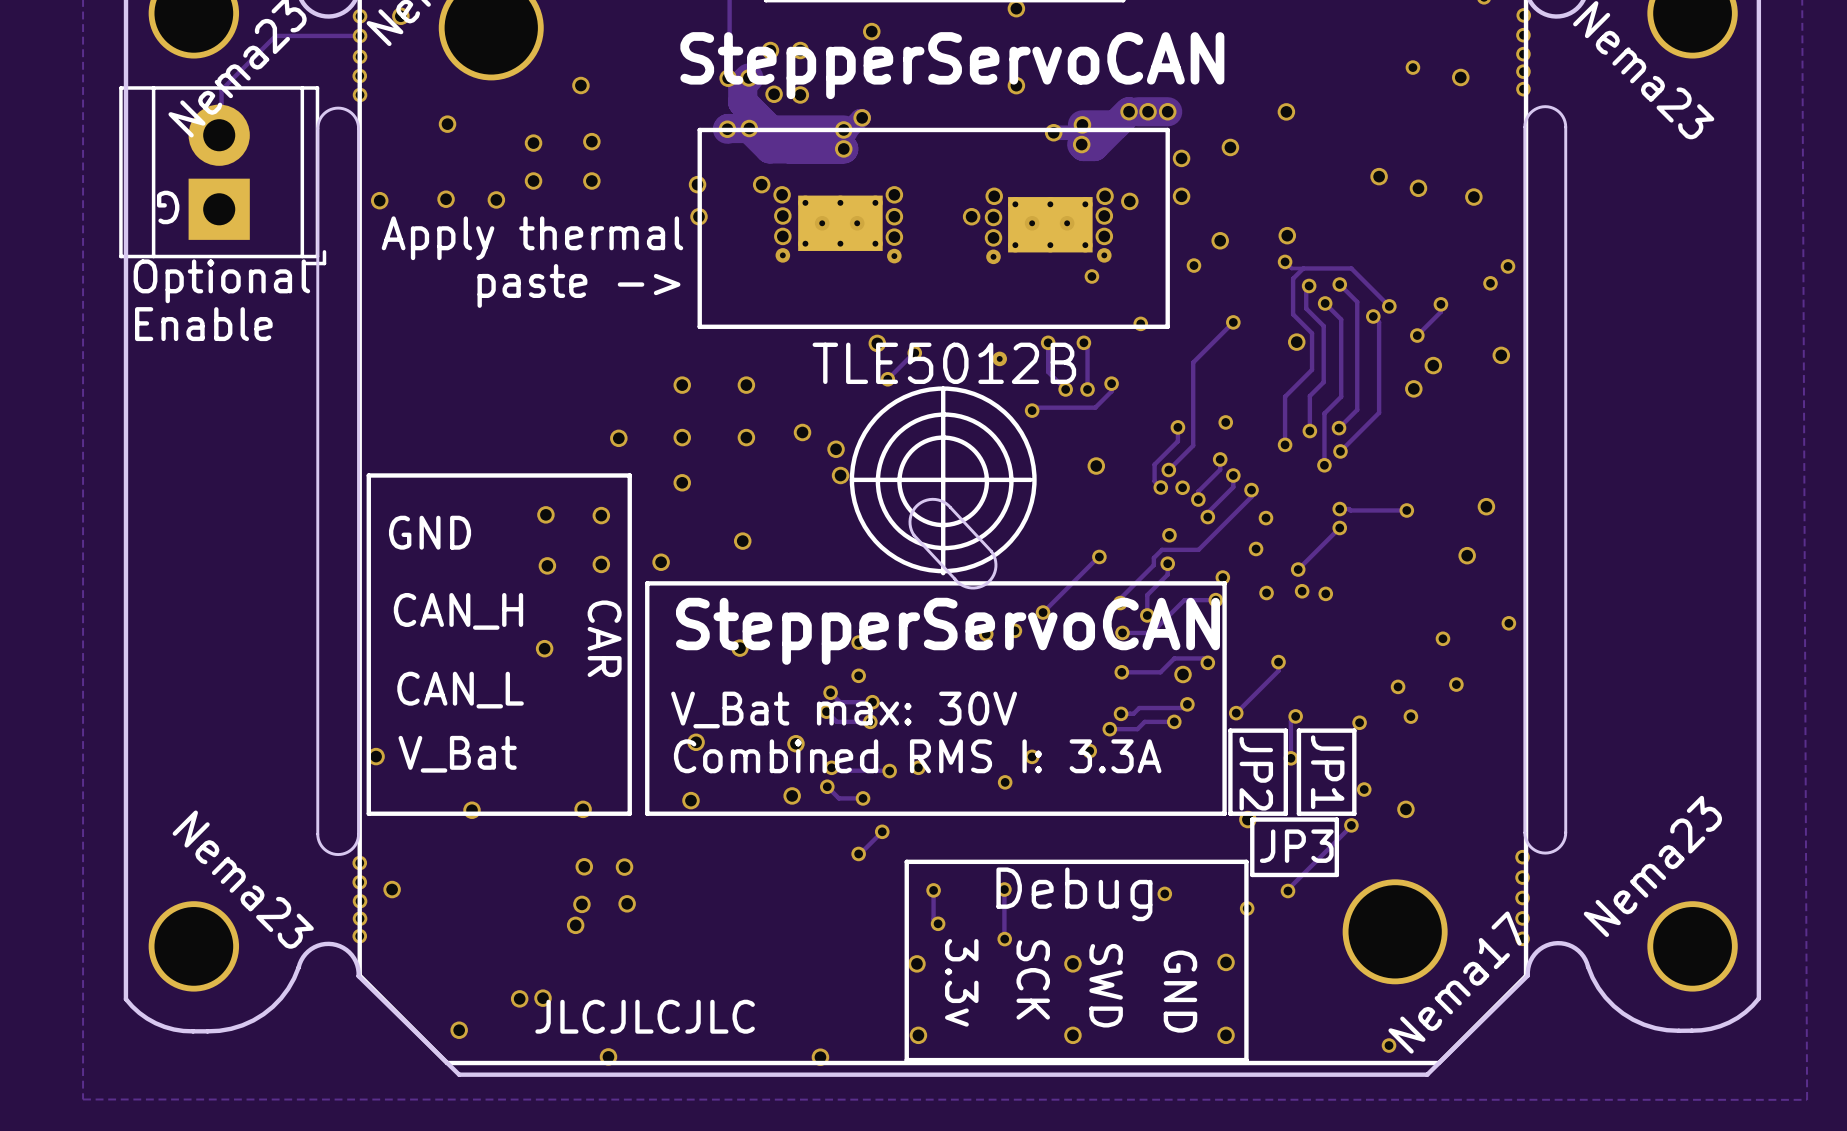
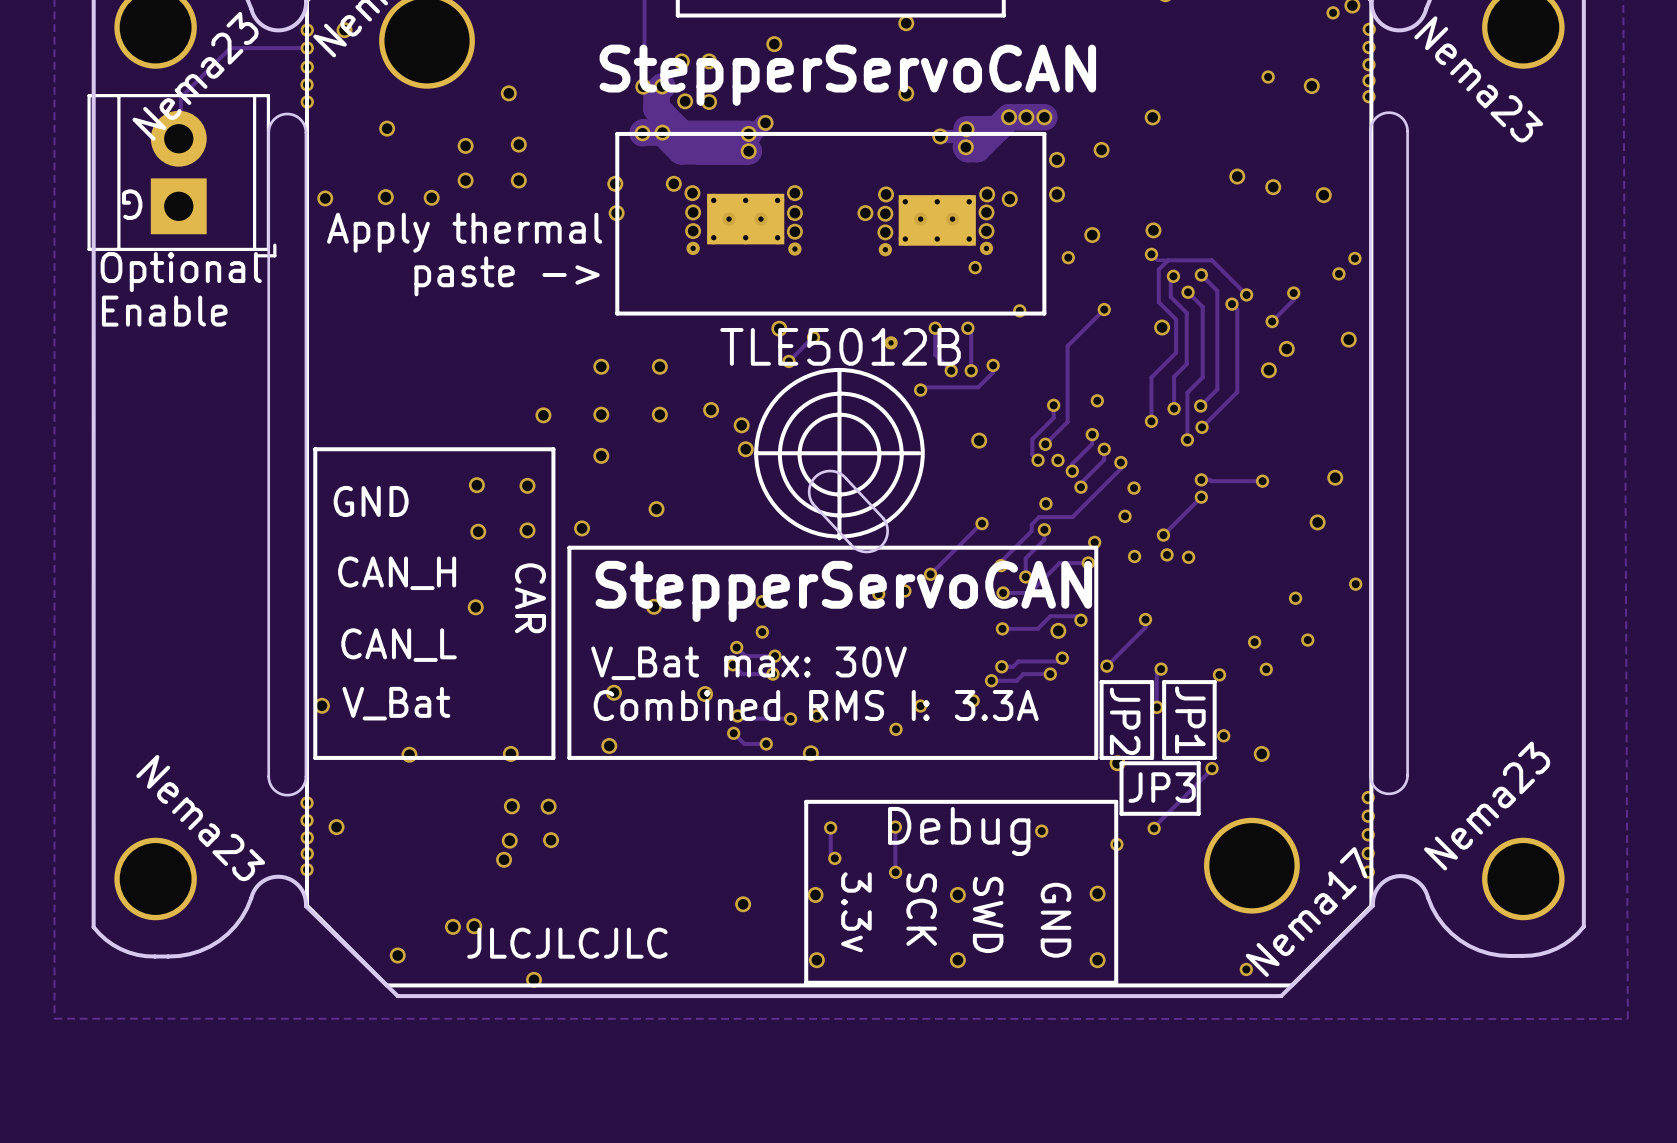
via: (792, 795) -> none
via: none -> (810, 753)
track: (882, 831) (858, 853) -> none
via: (882, 831) -> none
via: (858, 853) -> none
via position: (820, 1057) -> (743, 904)

